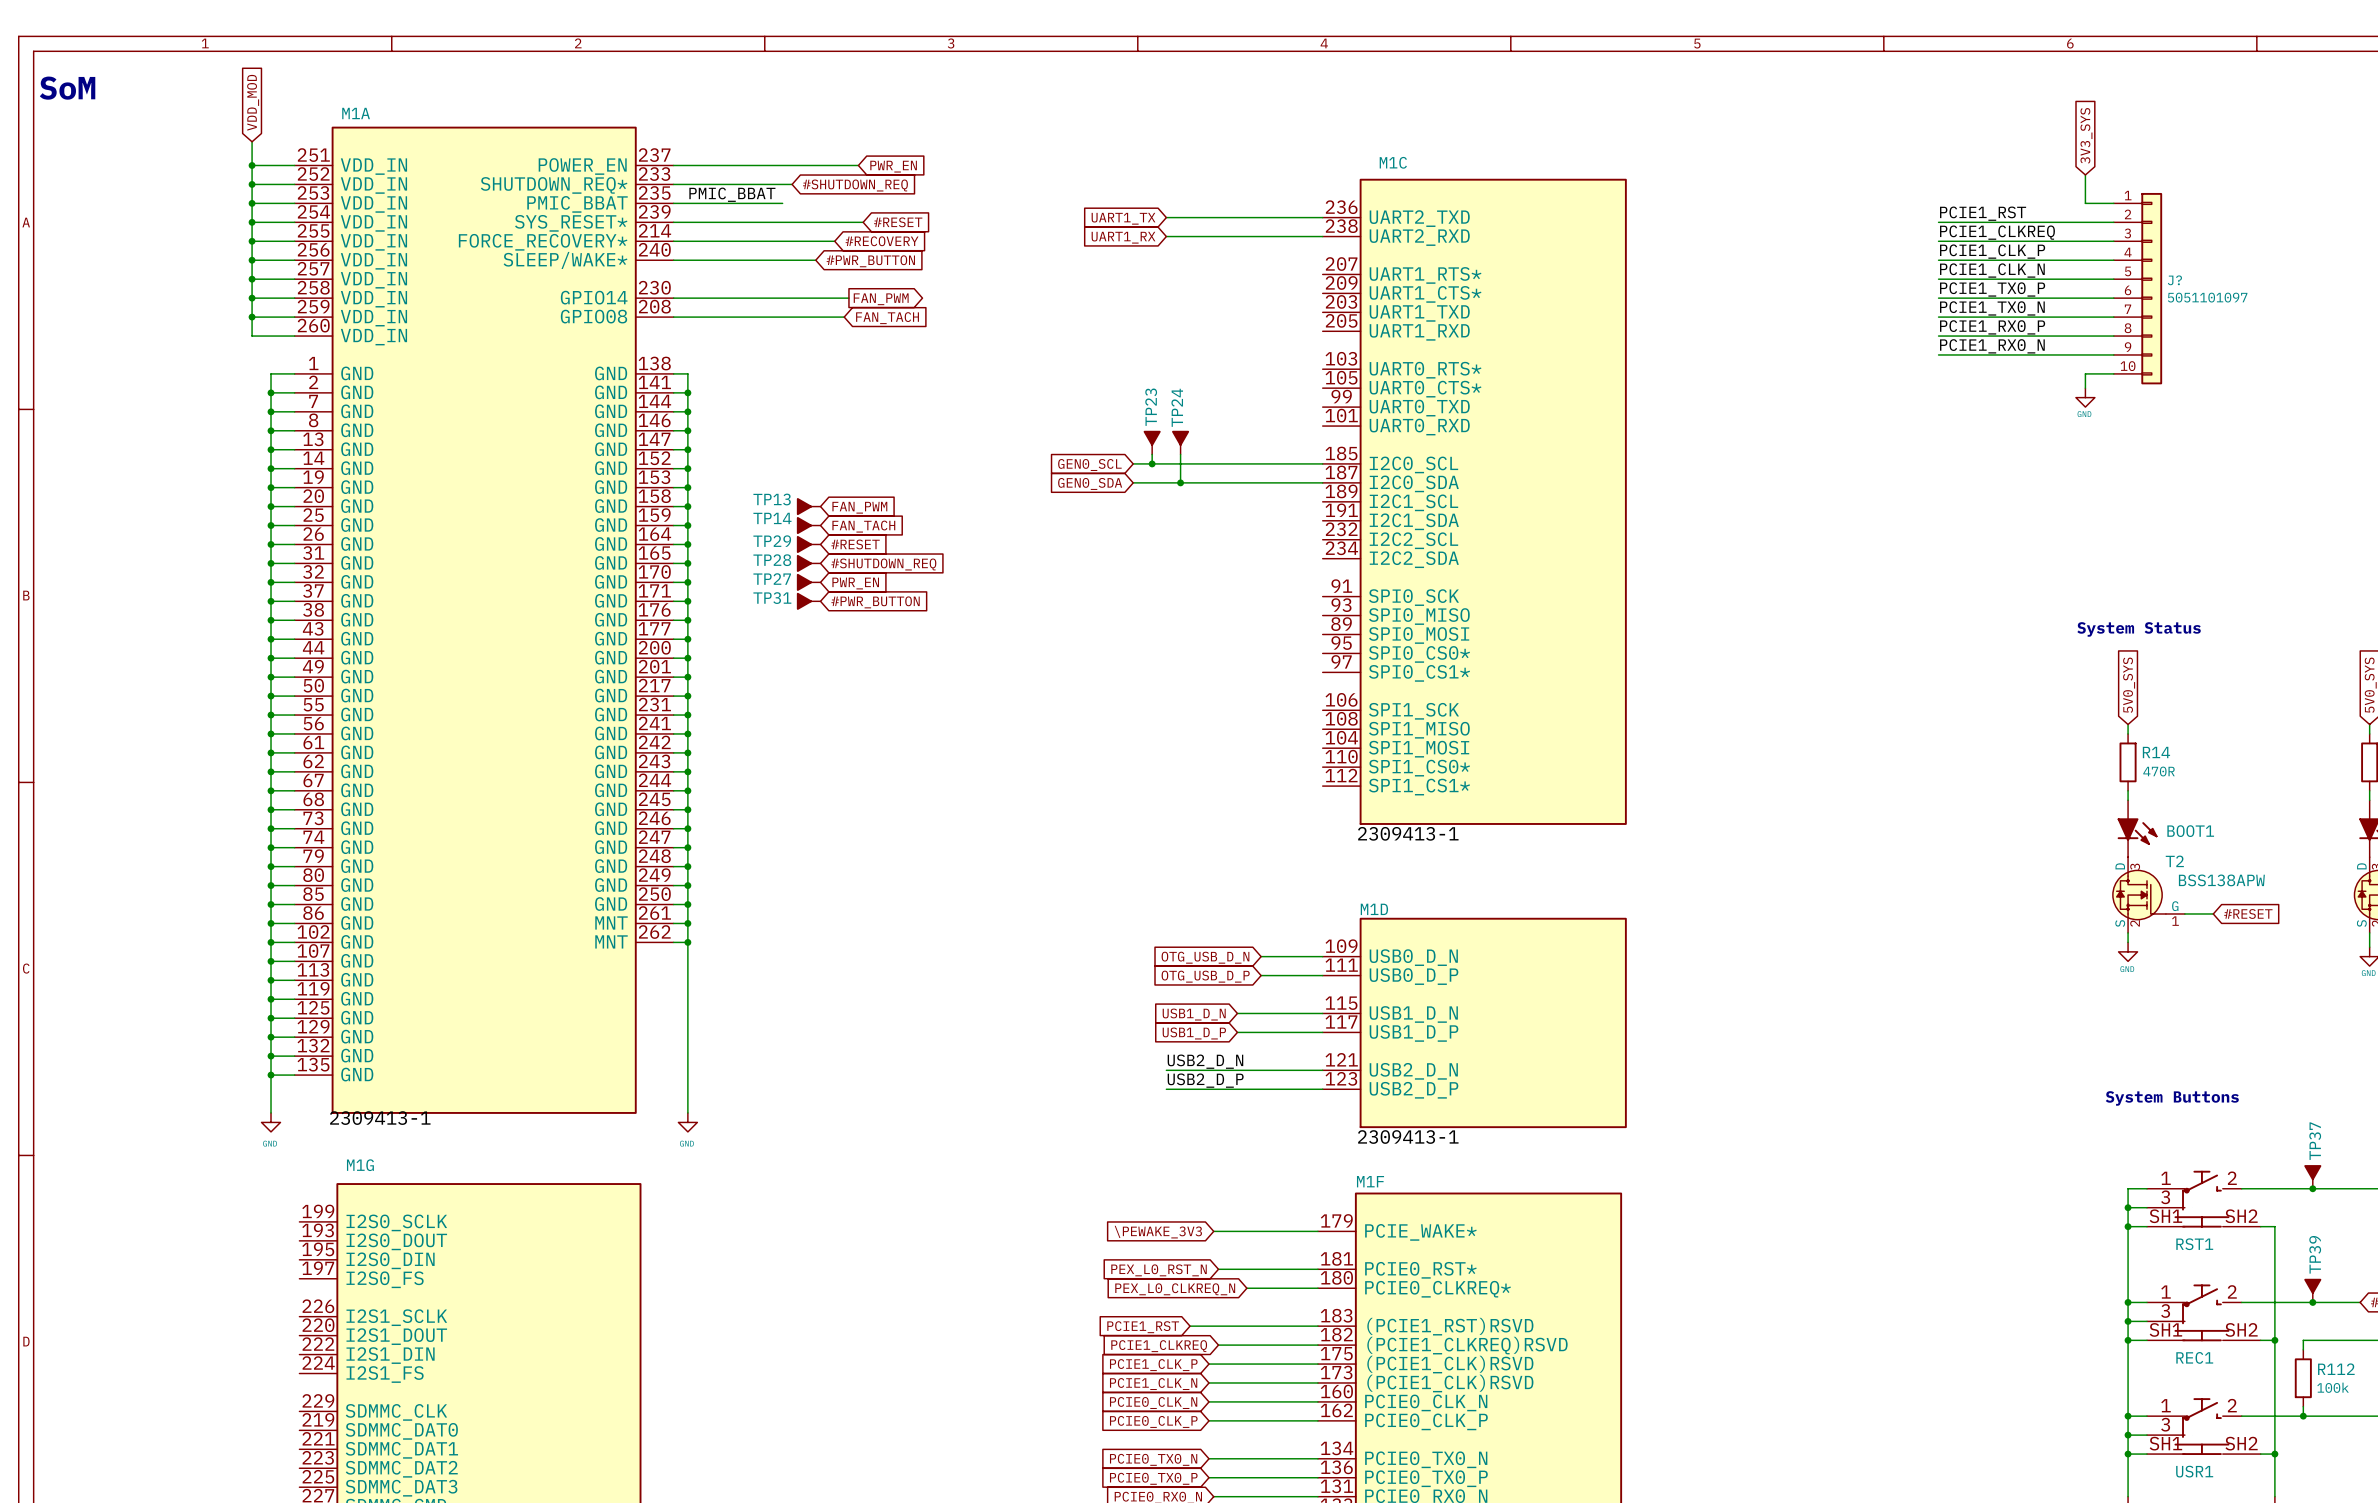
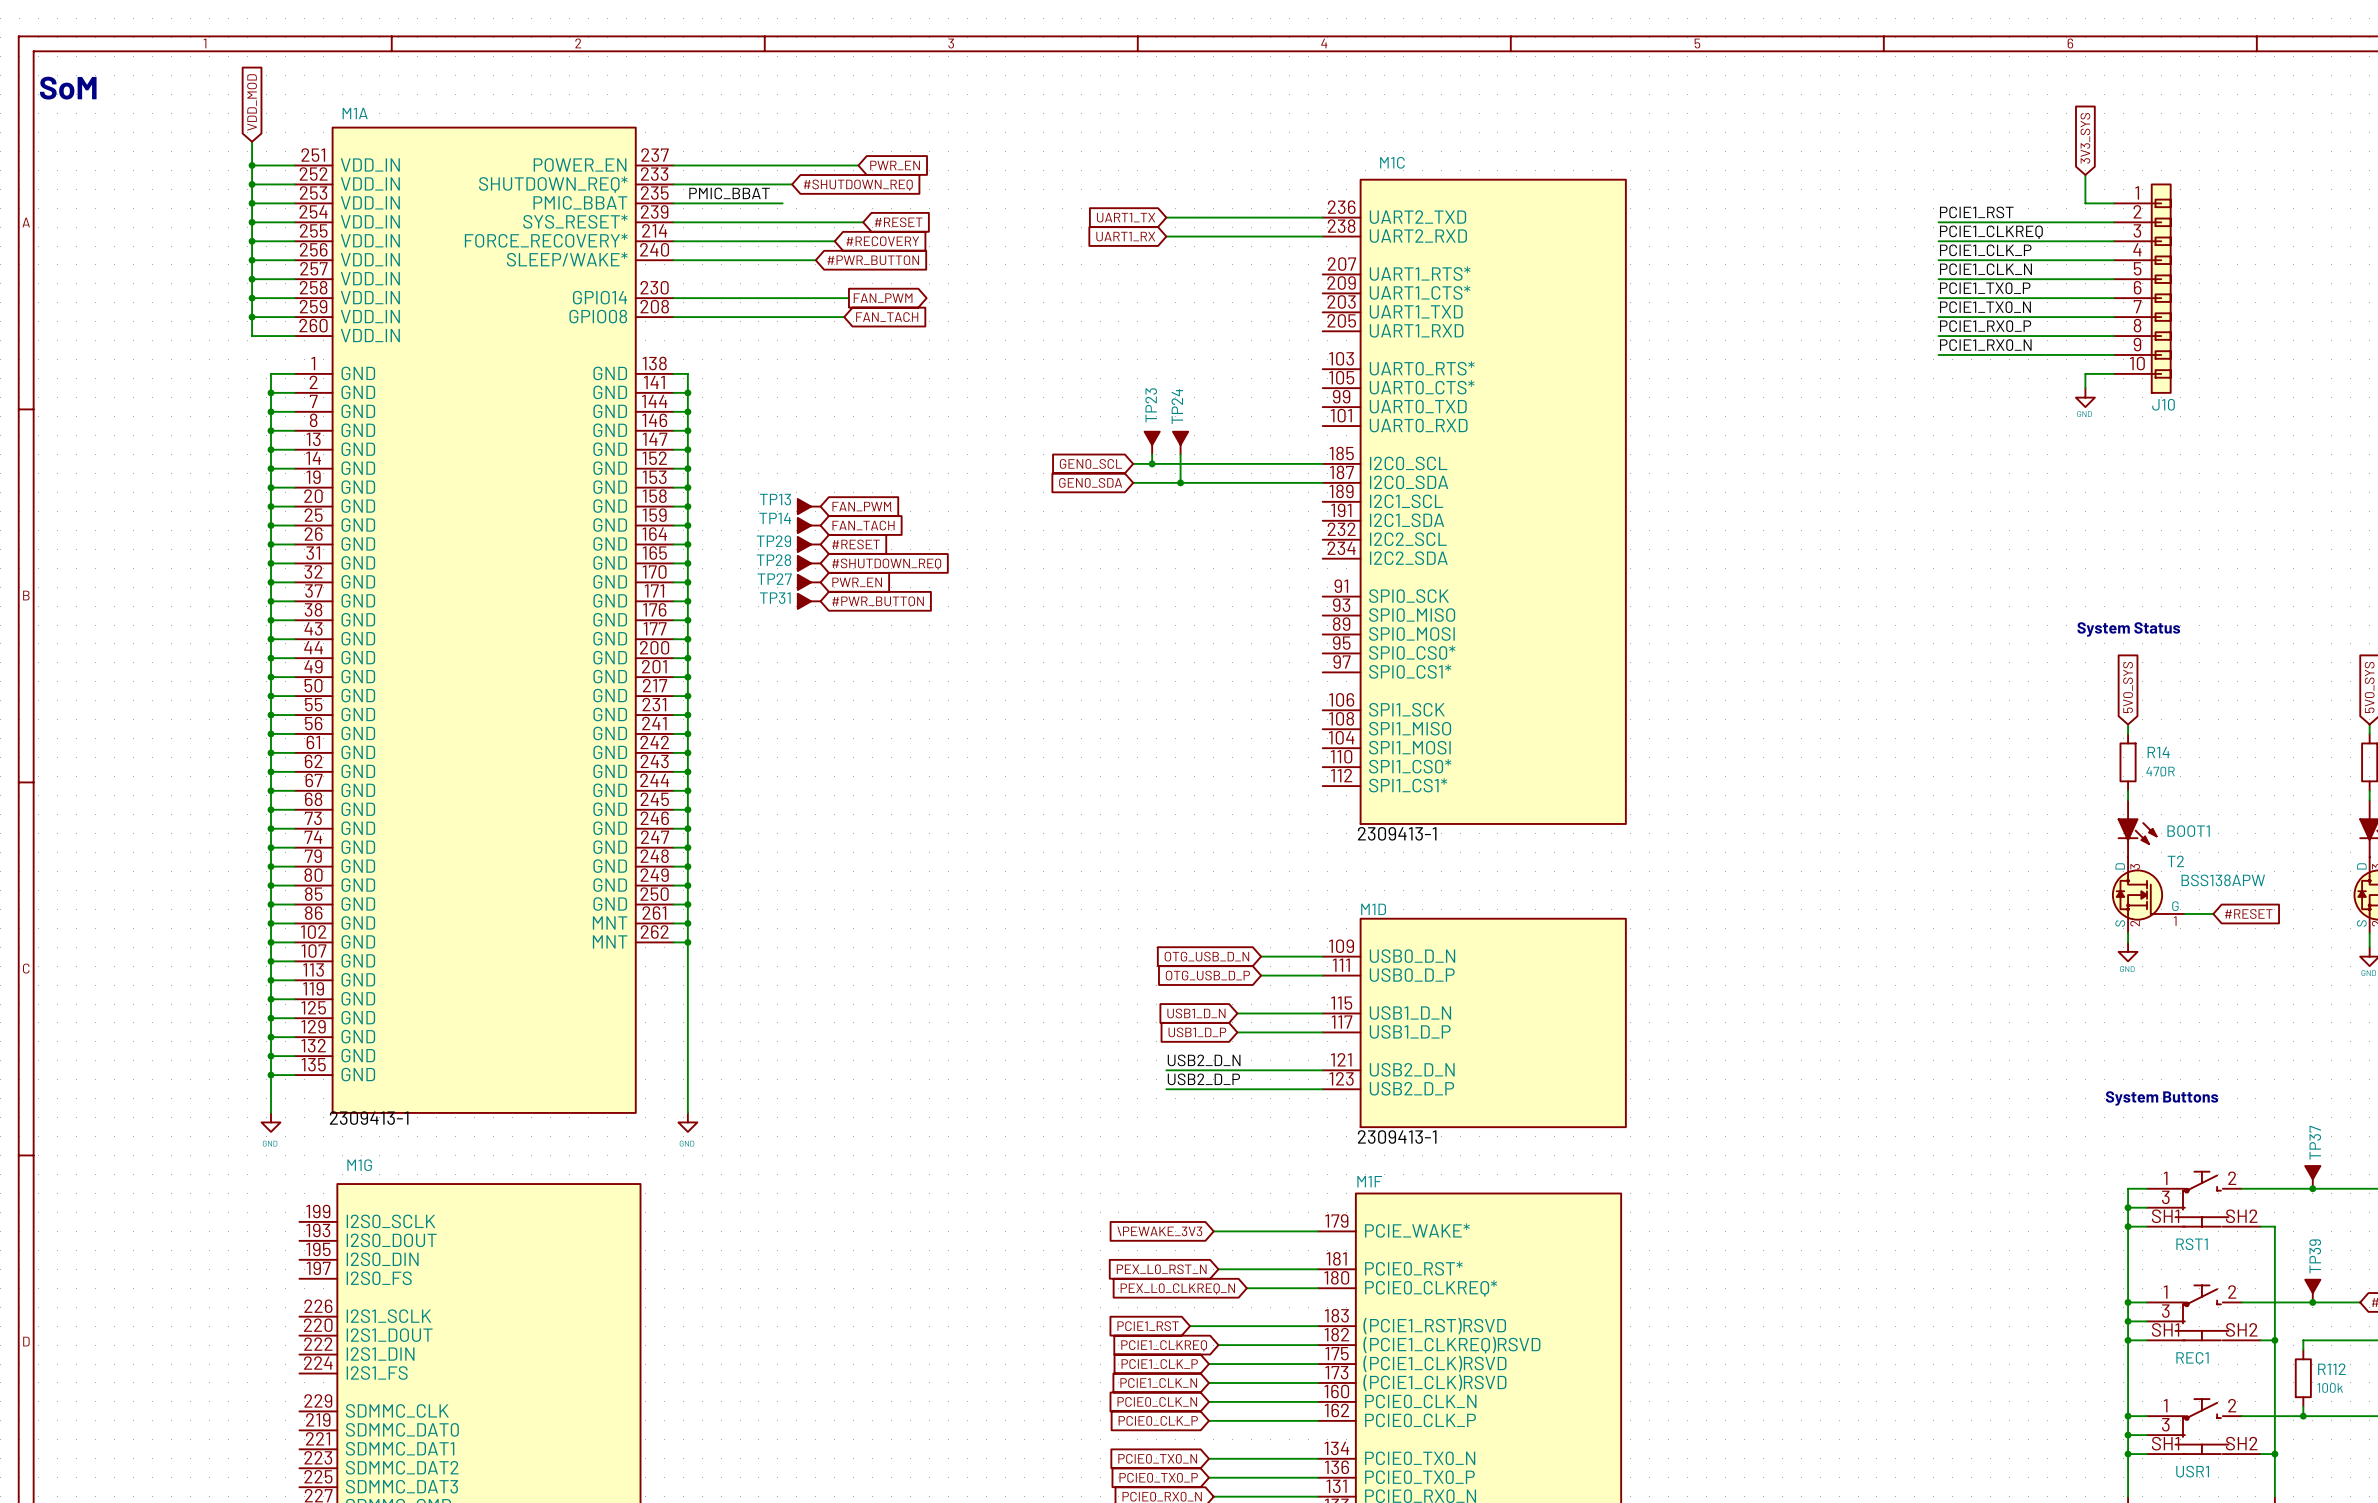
J?: 5051101097 (2137, 288) -> none
J10: none -> (2142, 288)

